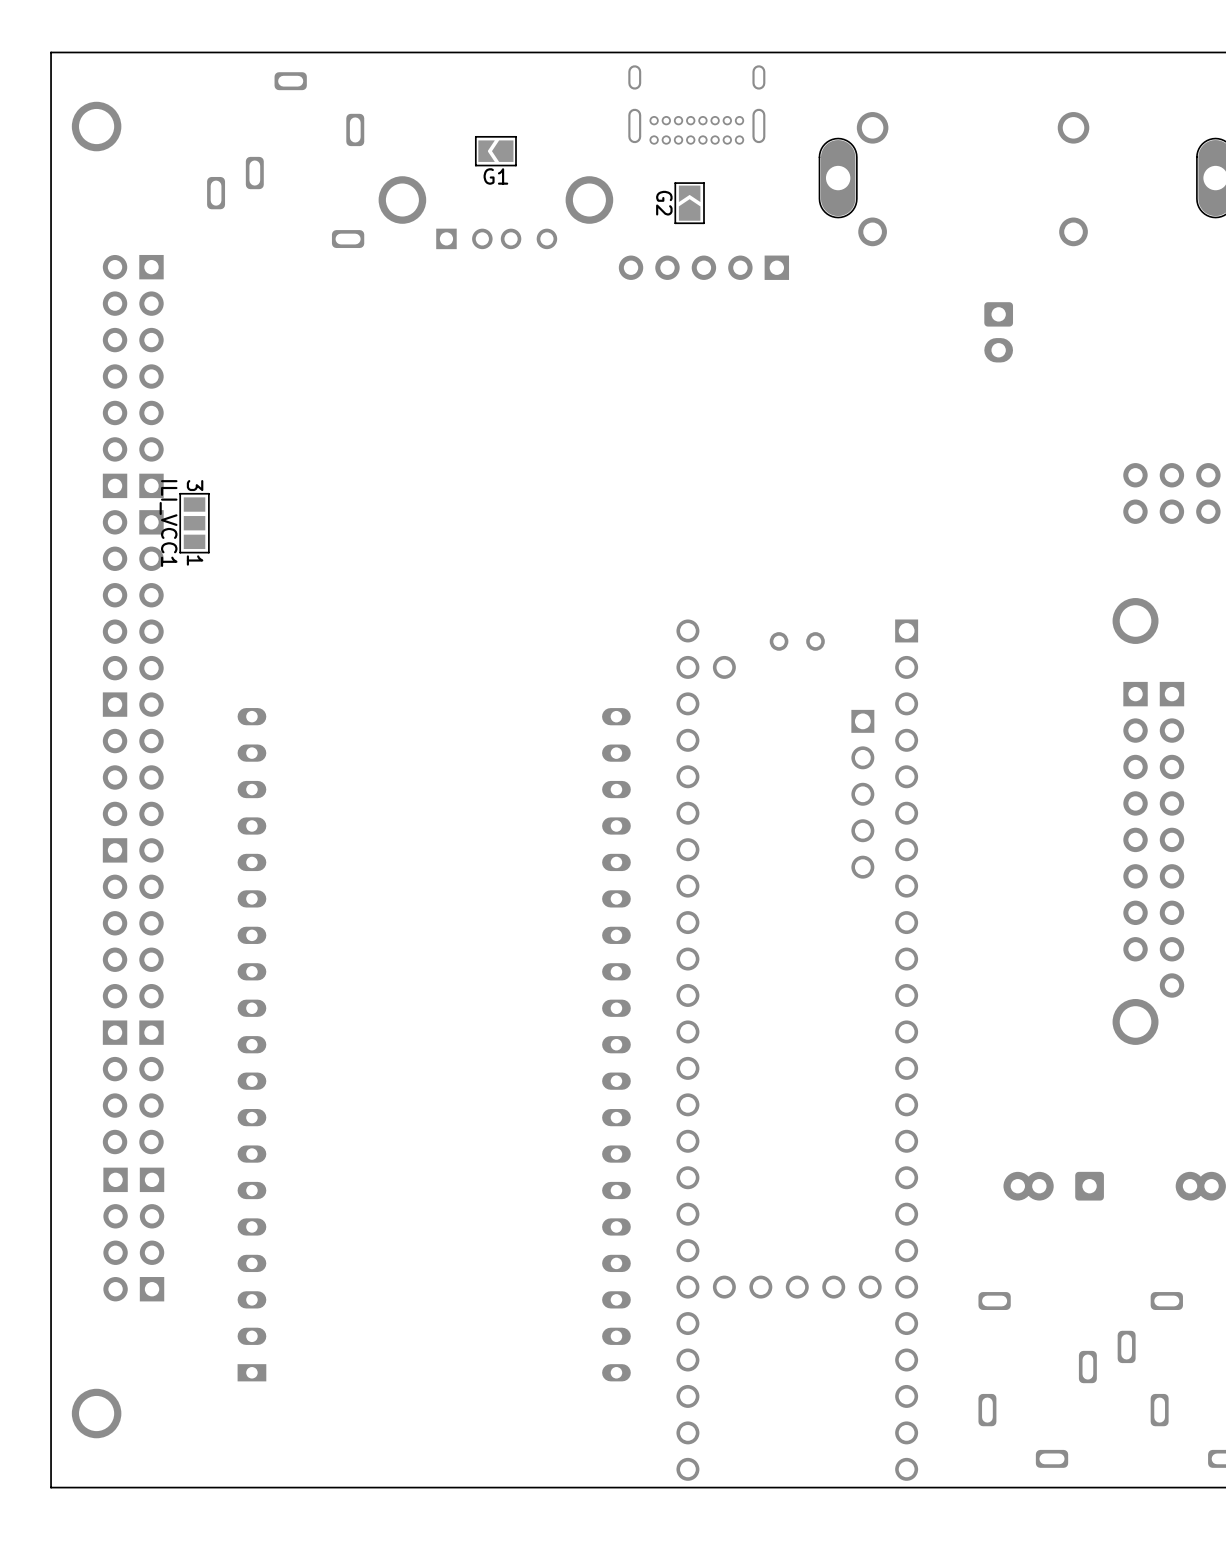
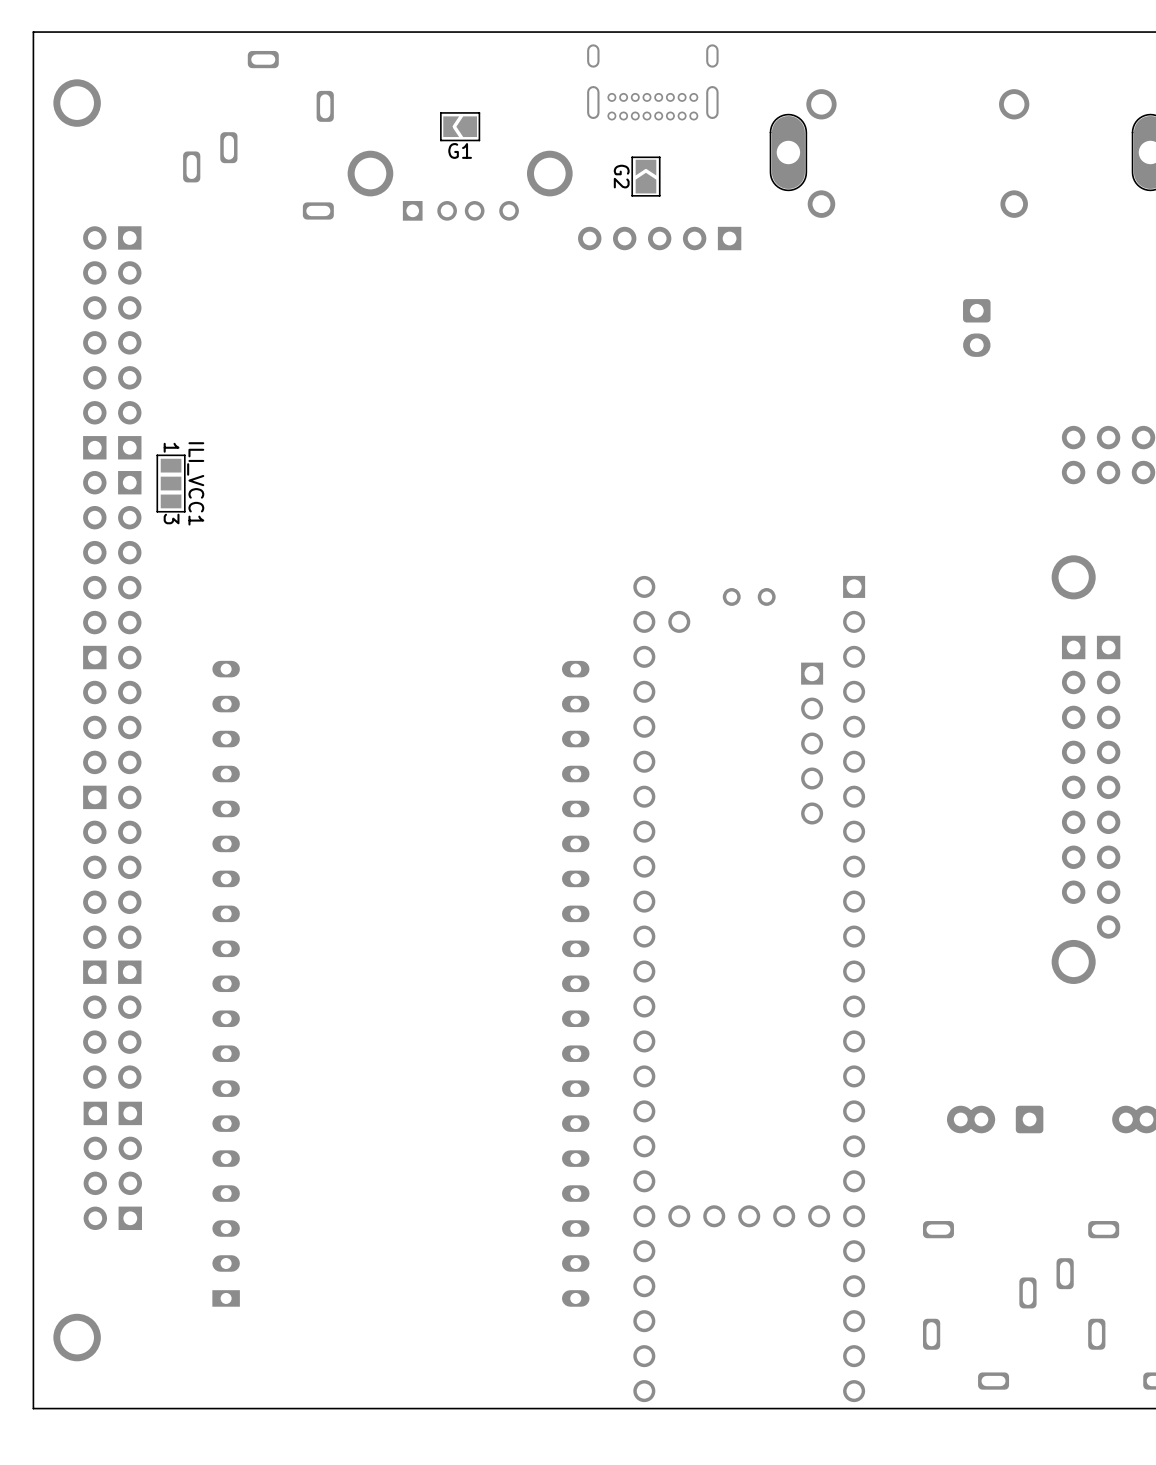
part position: (998, 332) -> (976, 327)
ILI_VCC1 rotation: 0° (194, 523) -> 180° (171, 483)

